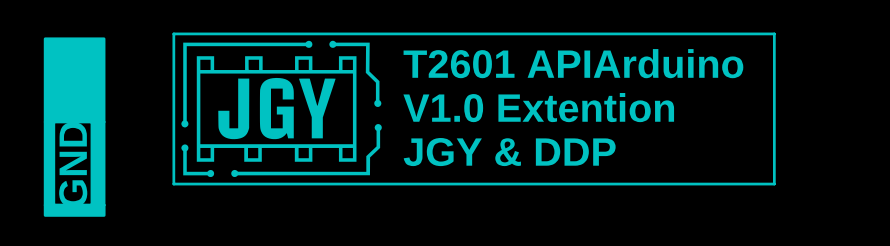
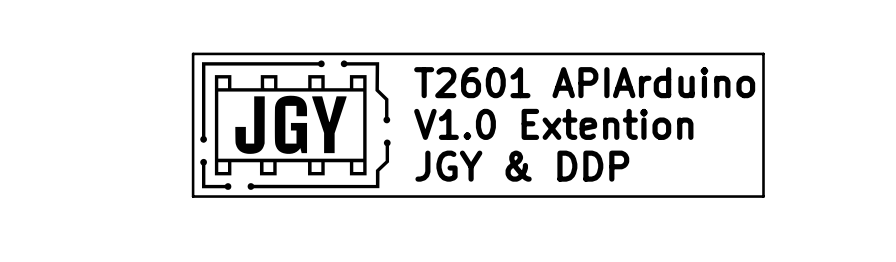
drawing: [43, 37, 106, 217] -> none
text: GND (73, 164) -> none

